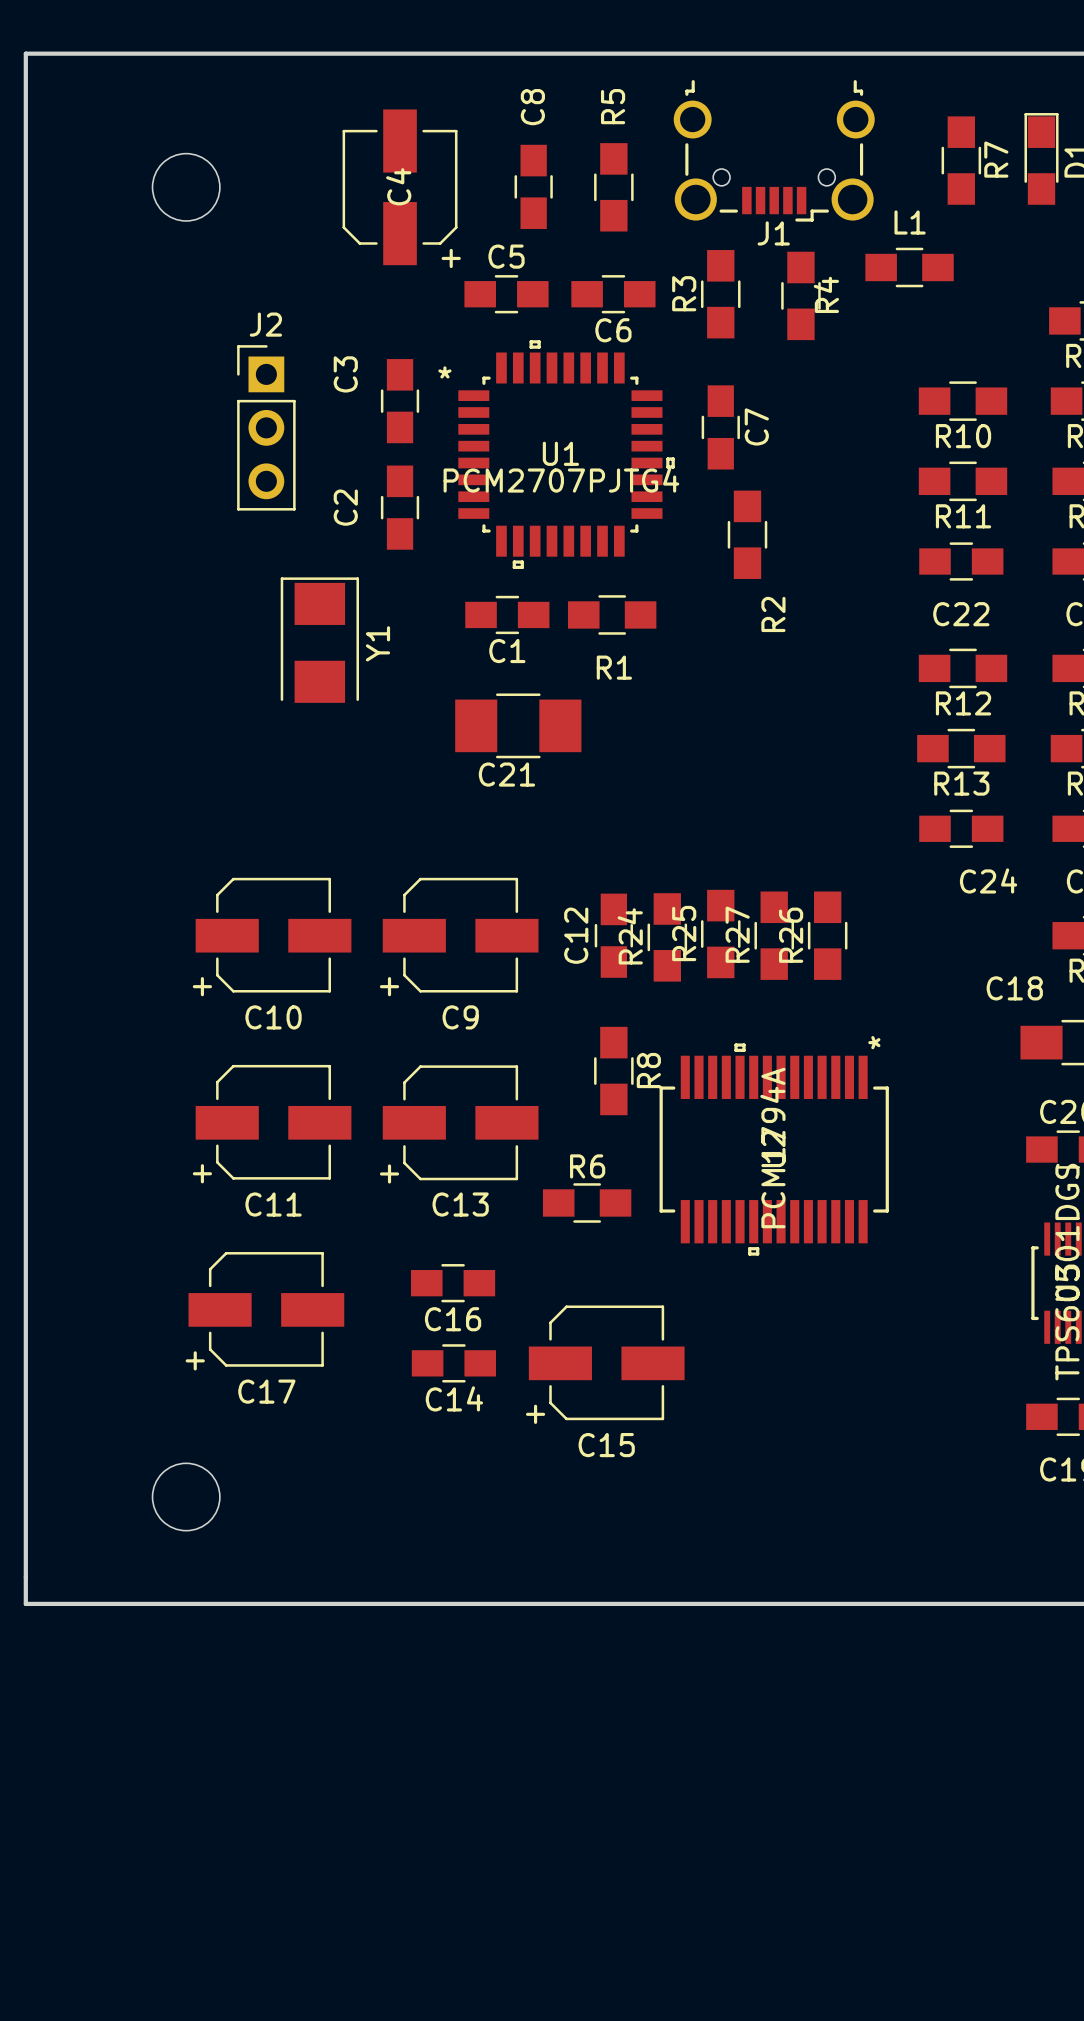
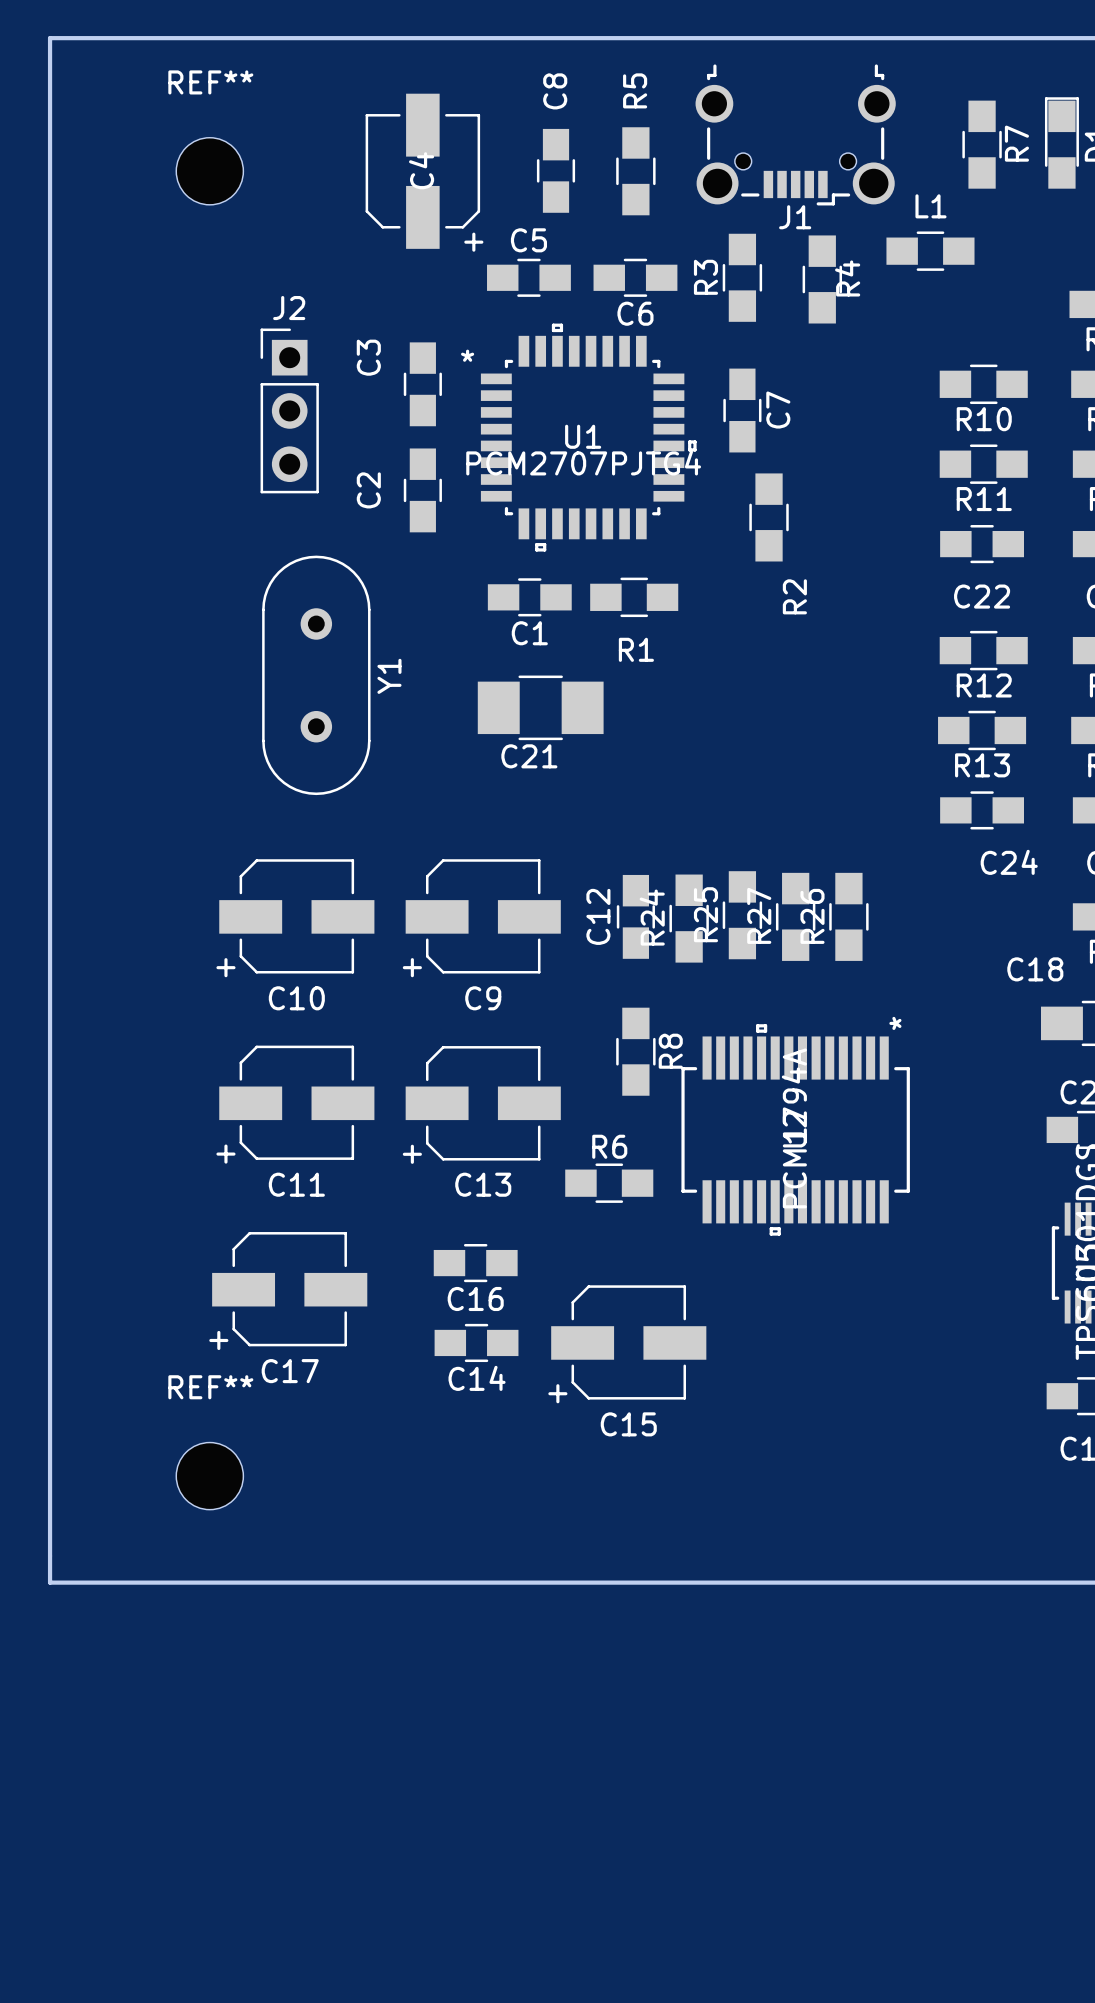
REF** name: none -> REF** (210, 82)
Y1 footprint: [280, 577, 359, 703] -> [262, 555, 371, 796]
REF** name: none -> REF** (210, 1387)

